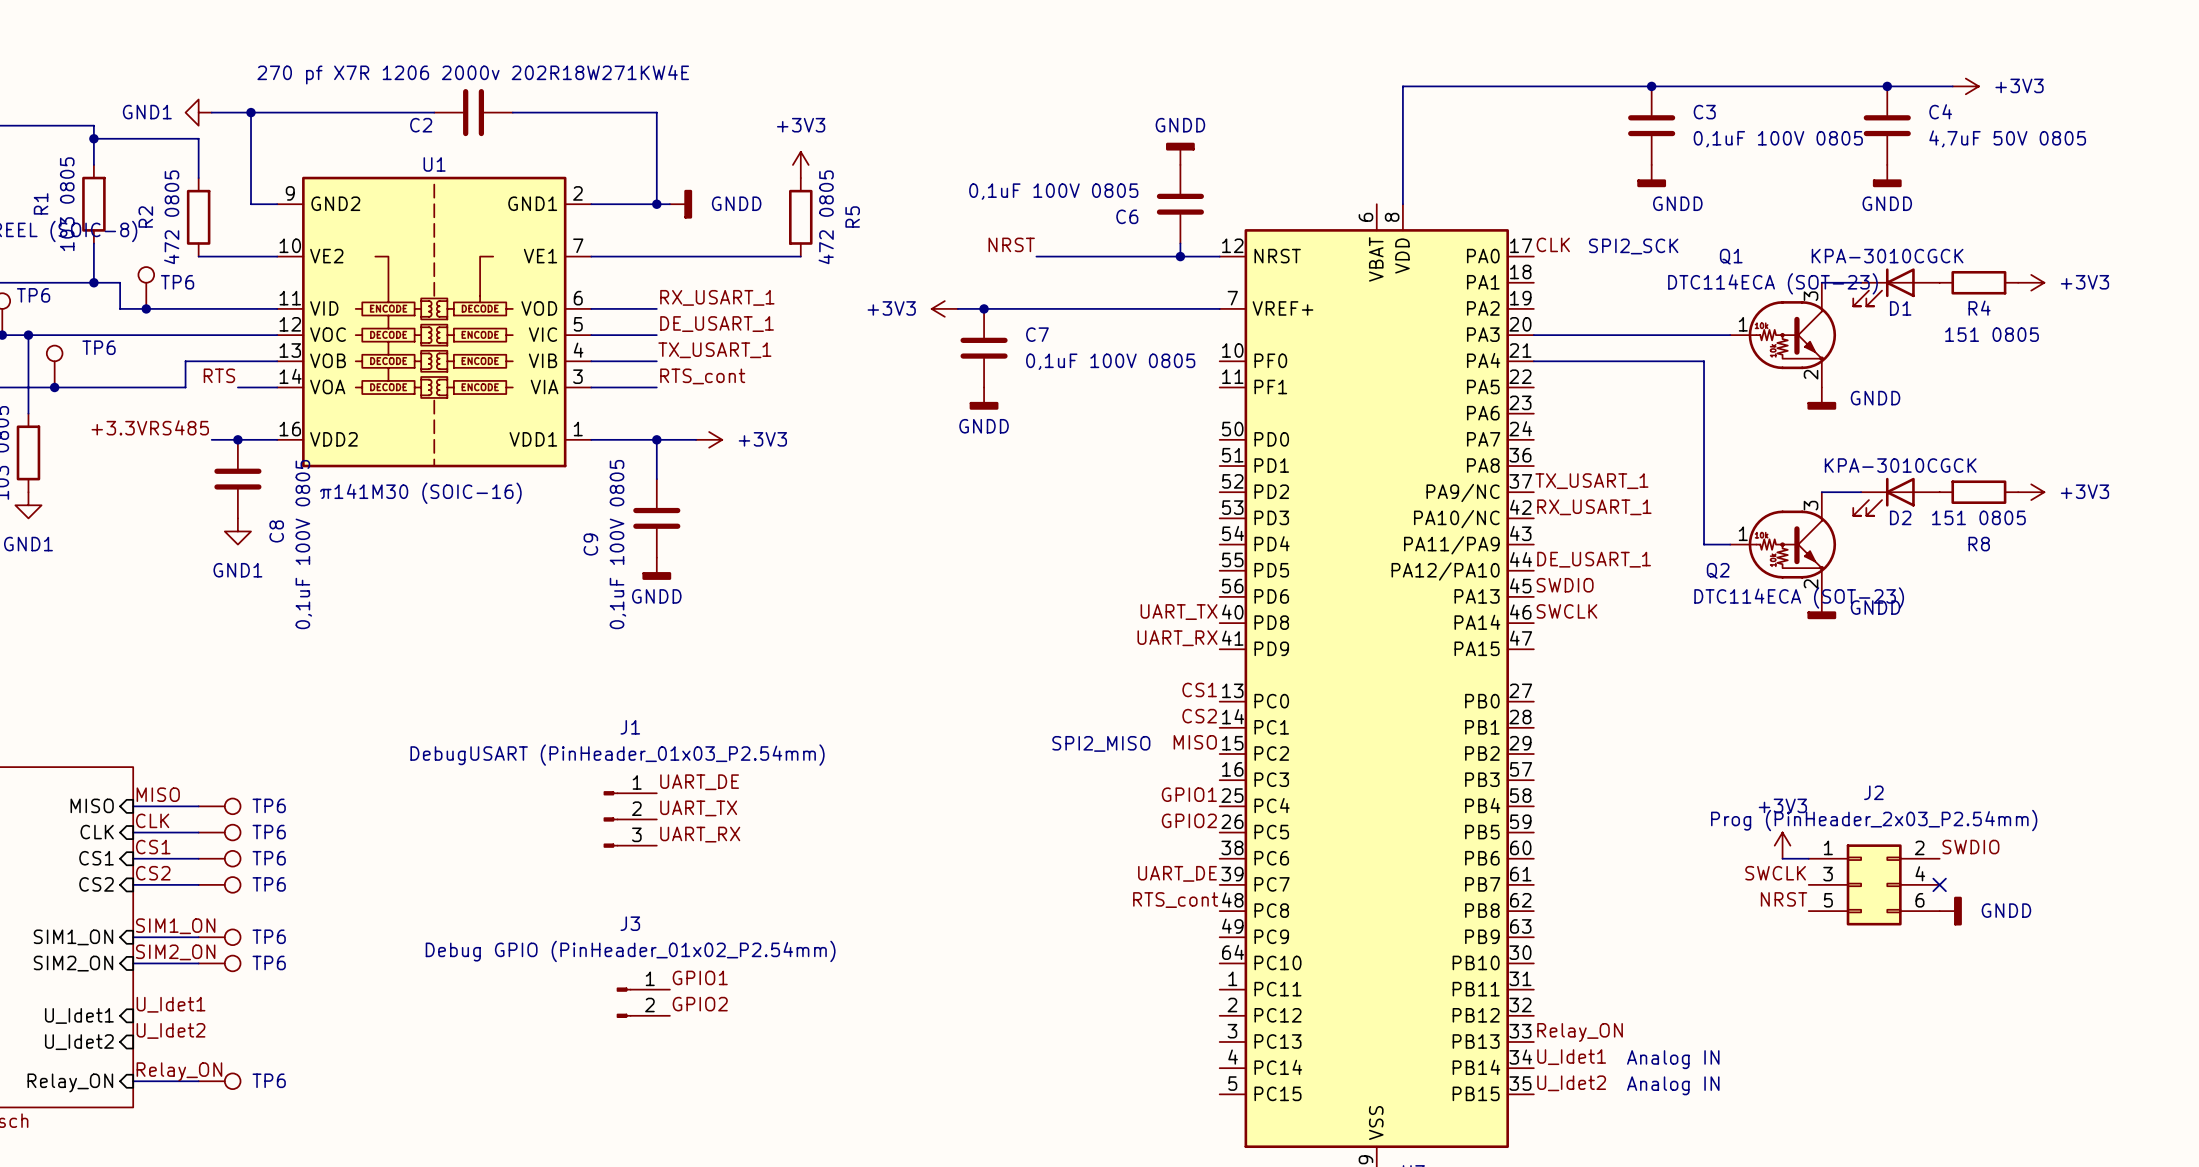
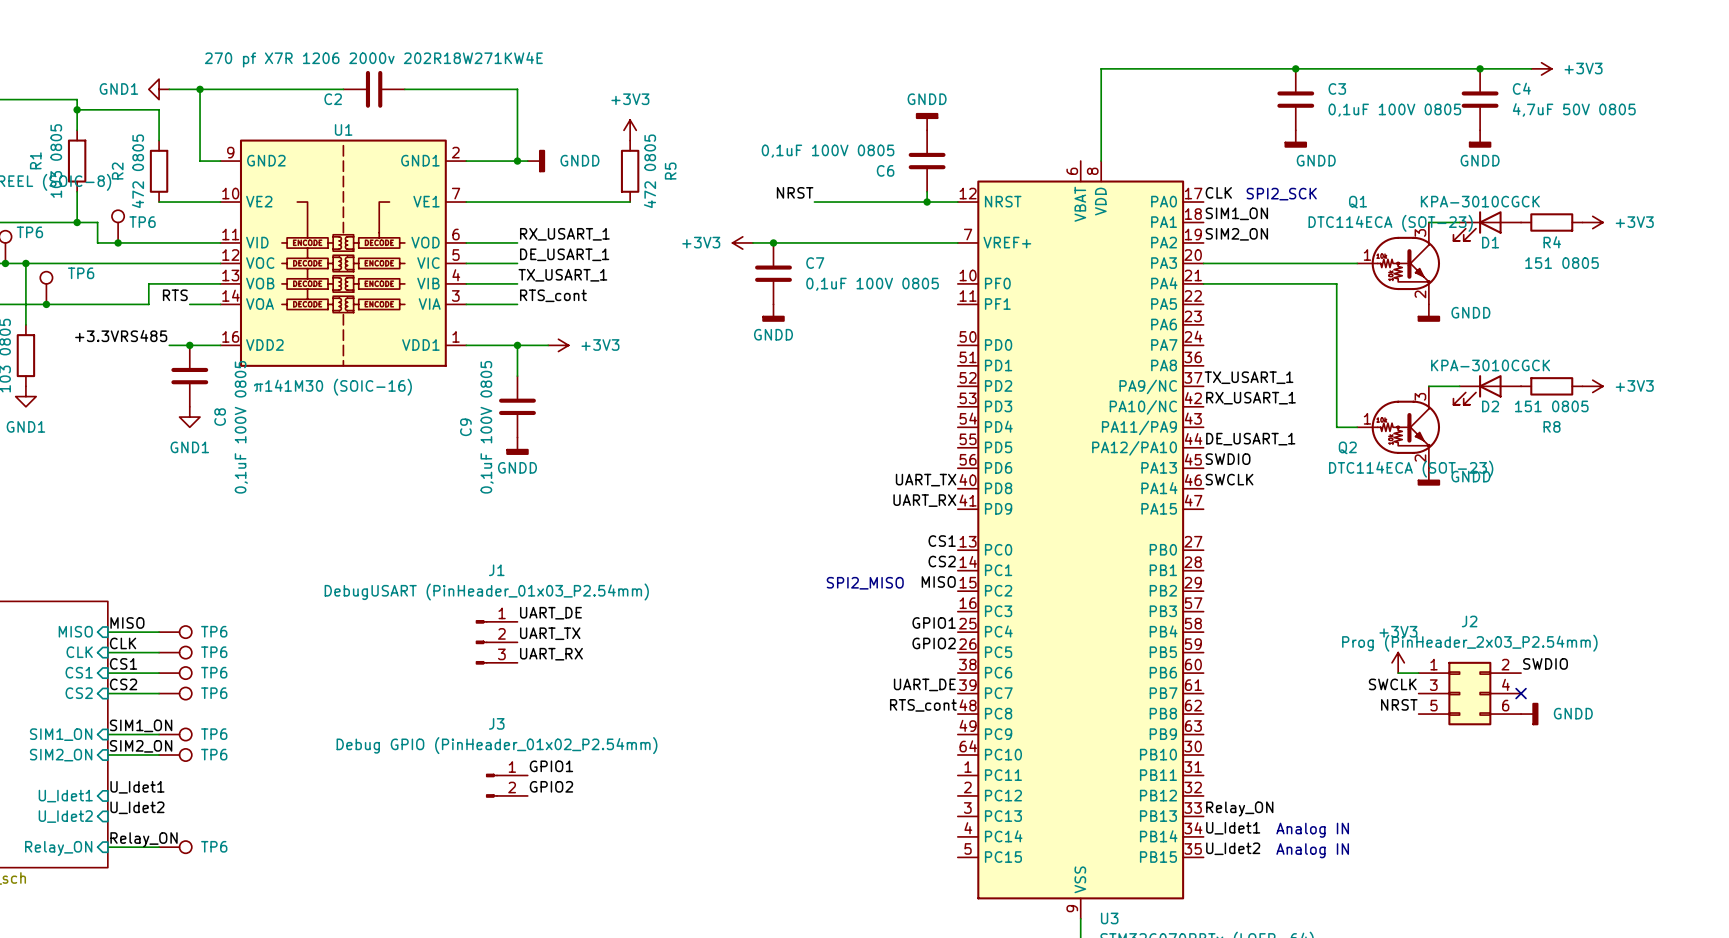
label: none -> SIM1_ON (1236, 213)
label: none -> SIM2_ON (1236, 234)

